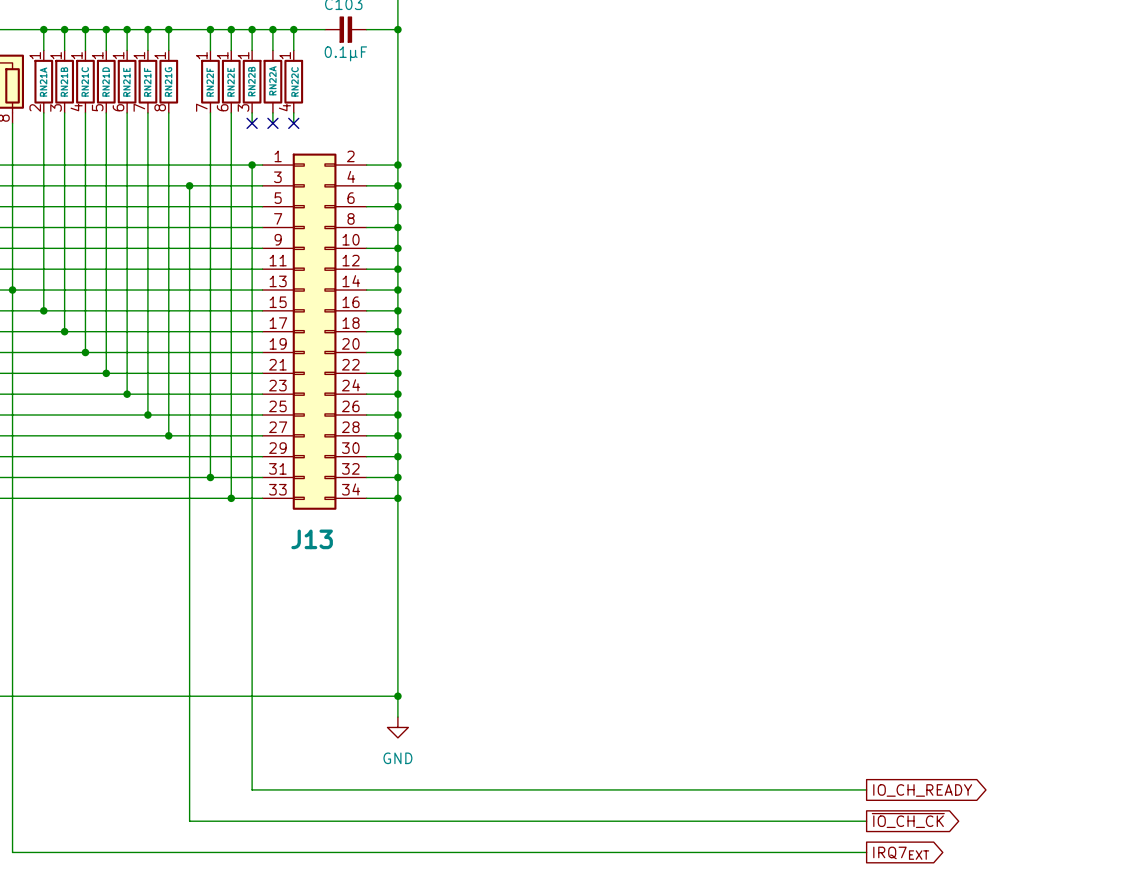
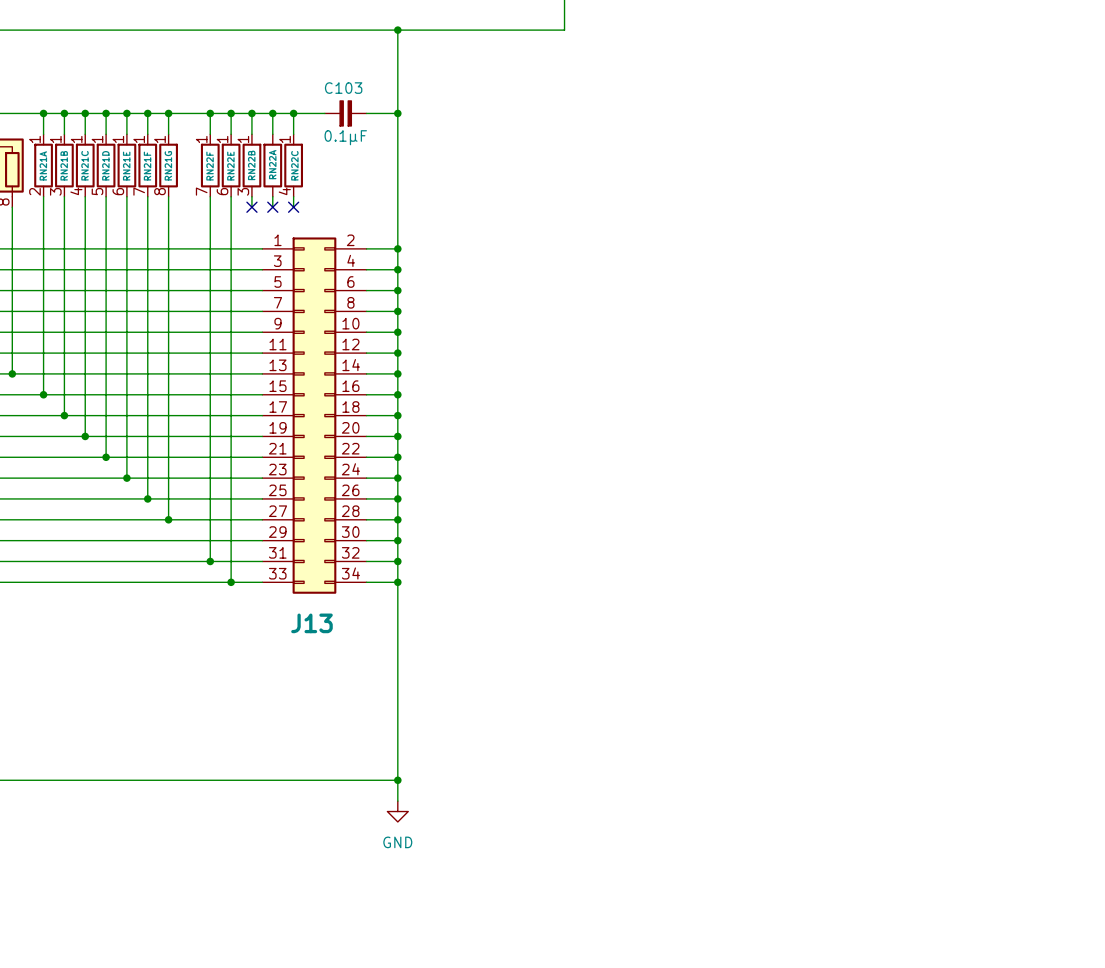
wire: (252, 165) (252, 789) (866, 789) -> none
junction: (252, 165) -> none
wire: (189, 185) (189, 821) (866, 821) -> none
junction: (189, 185) -> none
wire: (12, 290) (12, 852) (866, 852) -> none
global label: IO_CH_READY (922, 790) -> none
global label: ~{IO_CH_CK} (908, 820) -> none
global label: IRQ7EXT (901, 853) -> none

